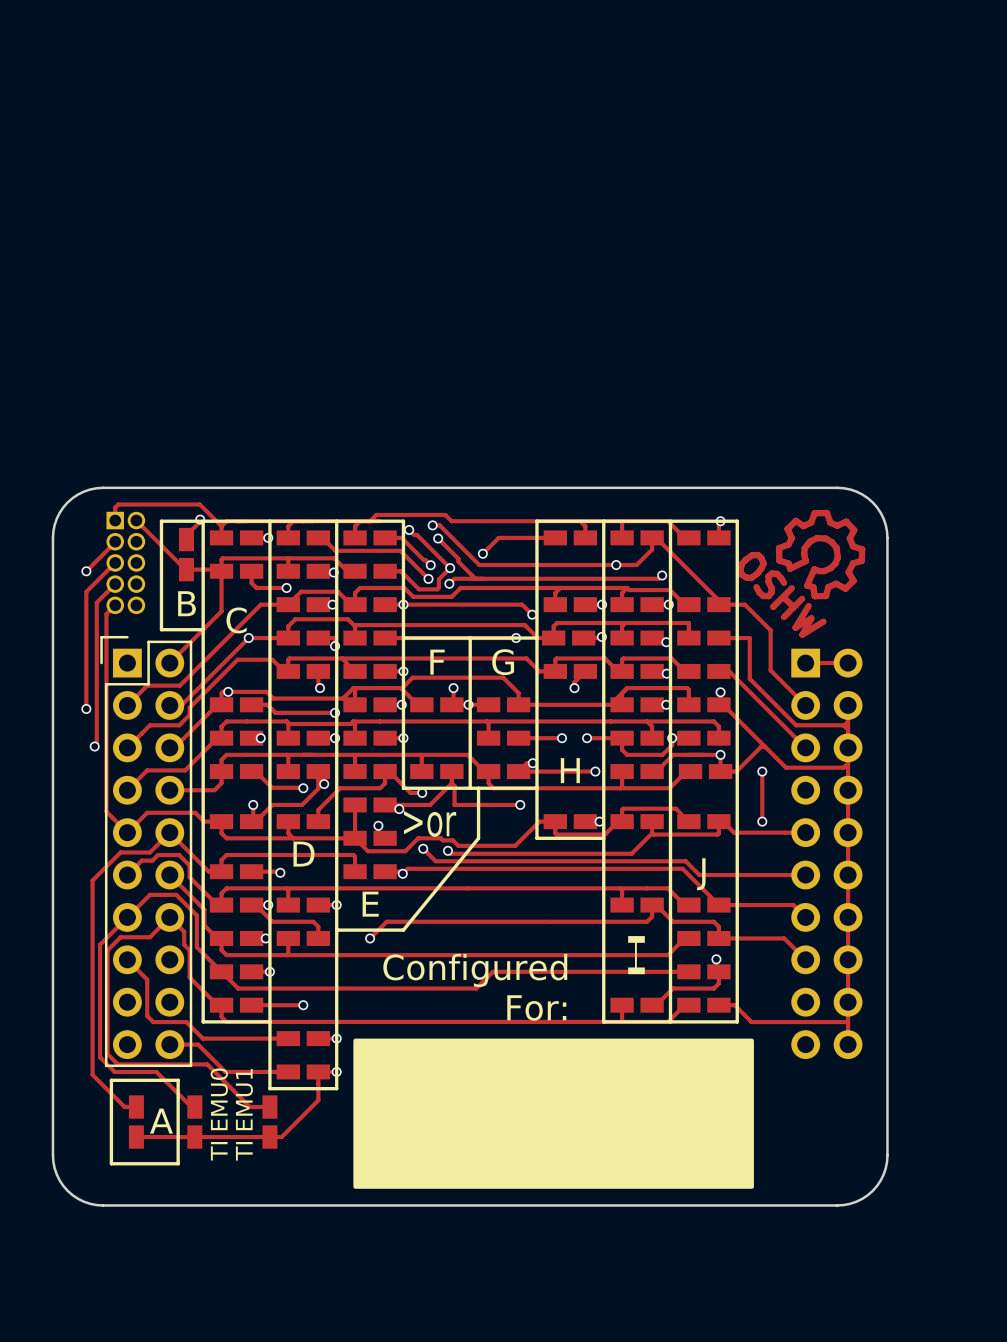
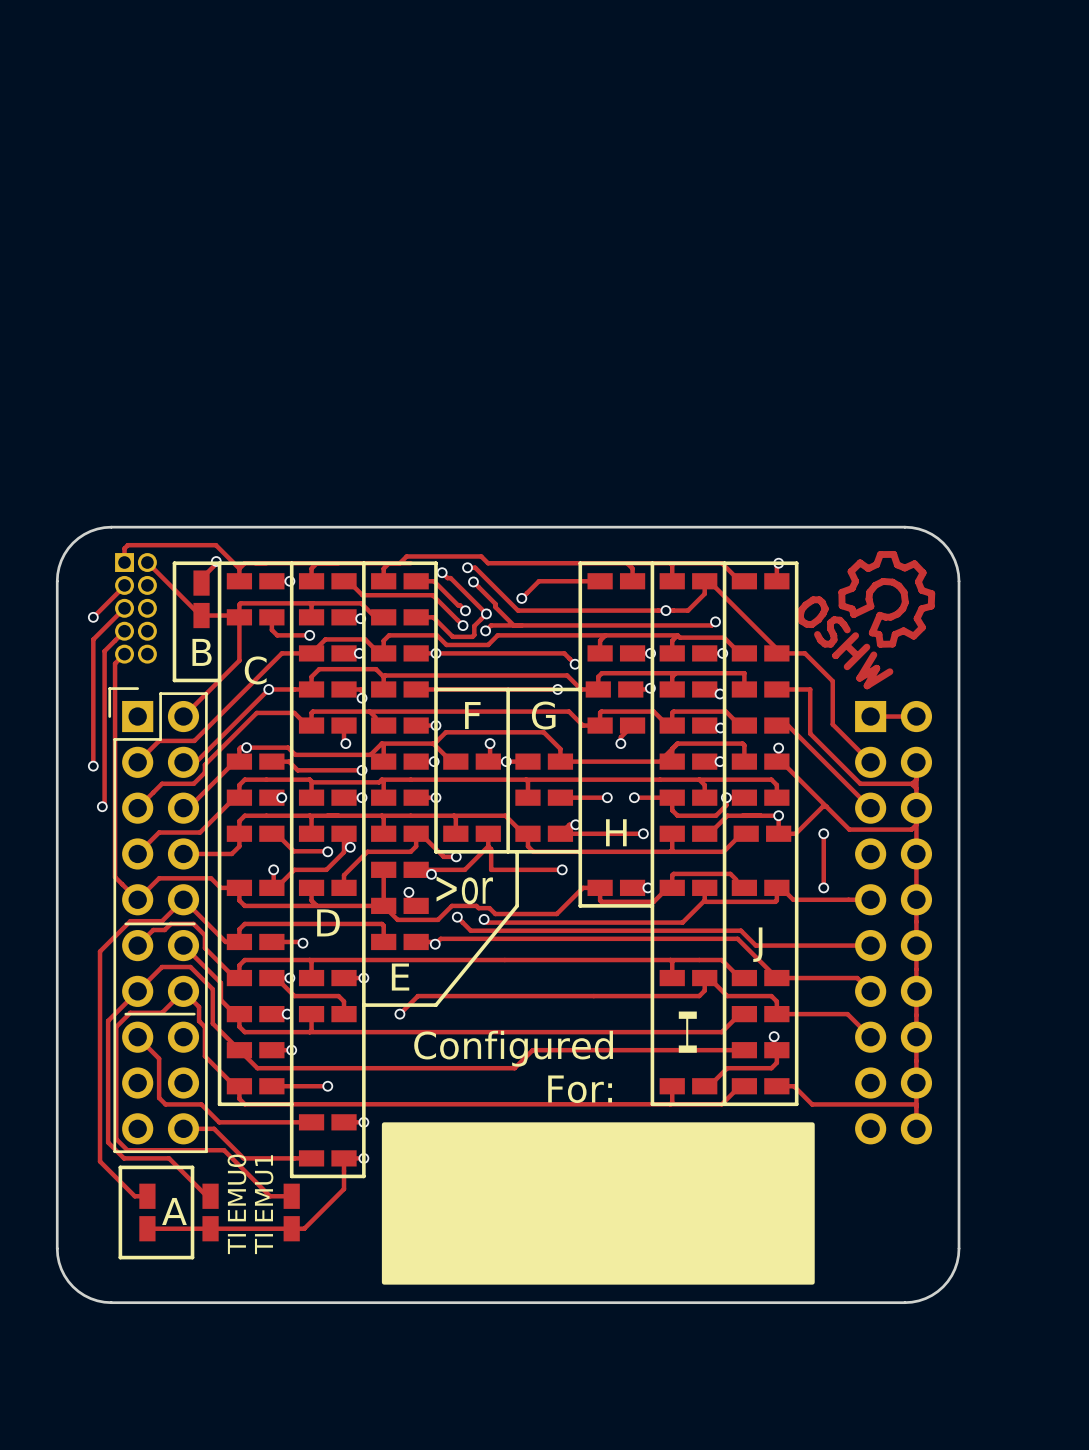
line: none -> (125, 923) (194, 923)
line: none -> (125, 1014) (194, 1014)

